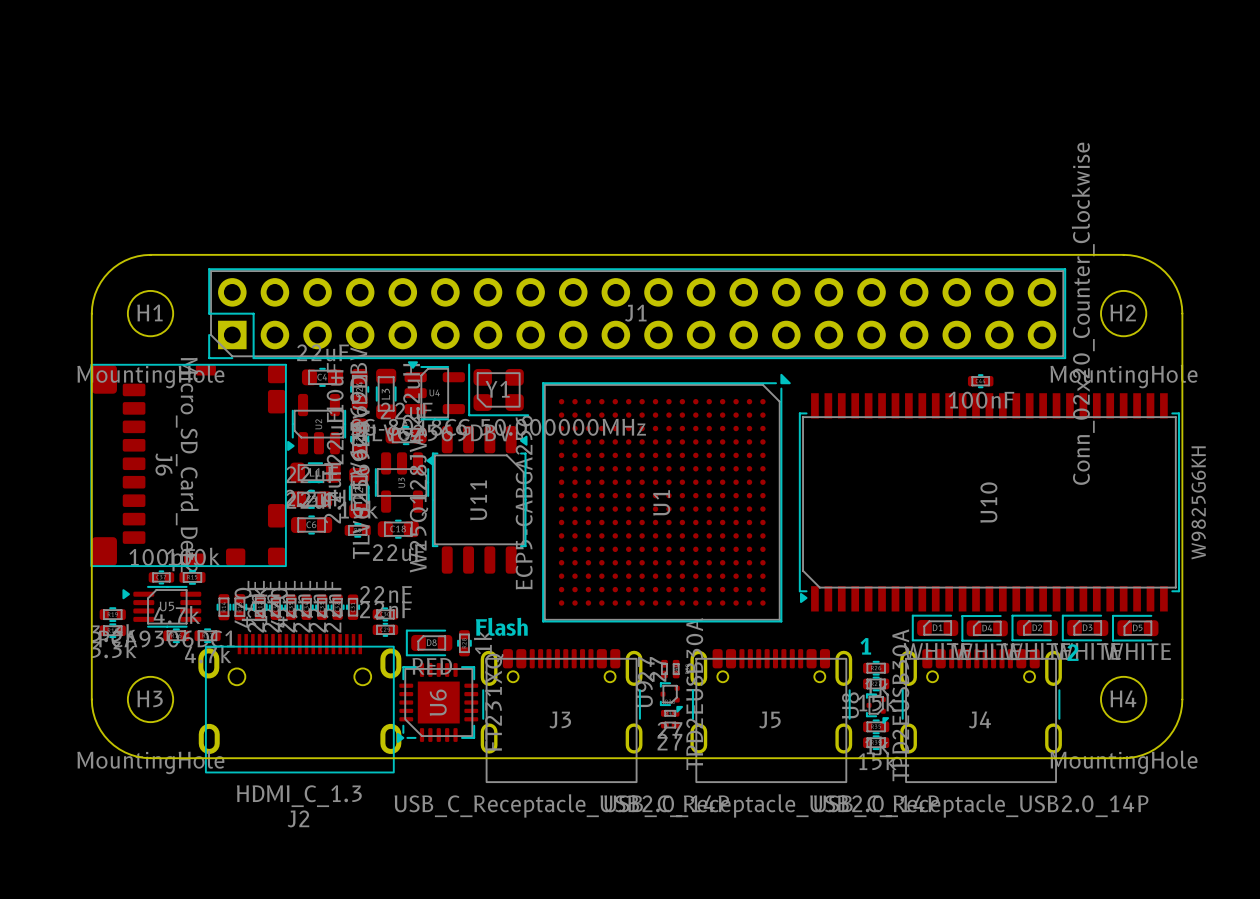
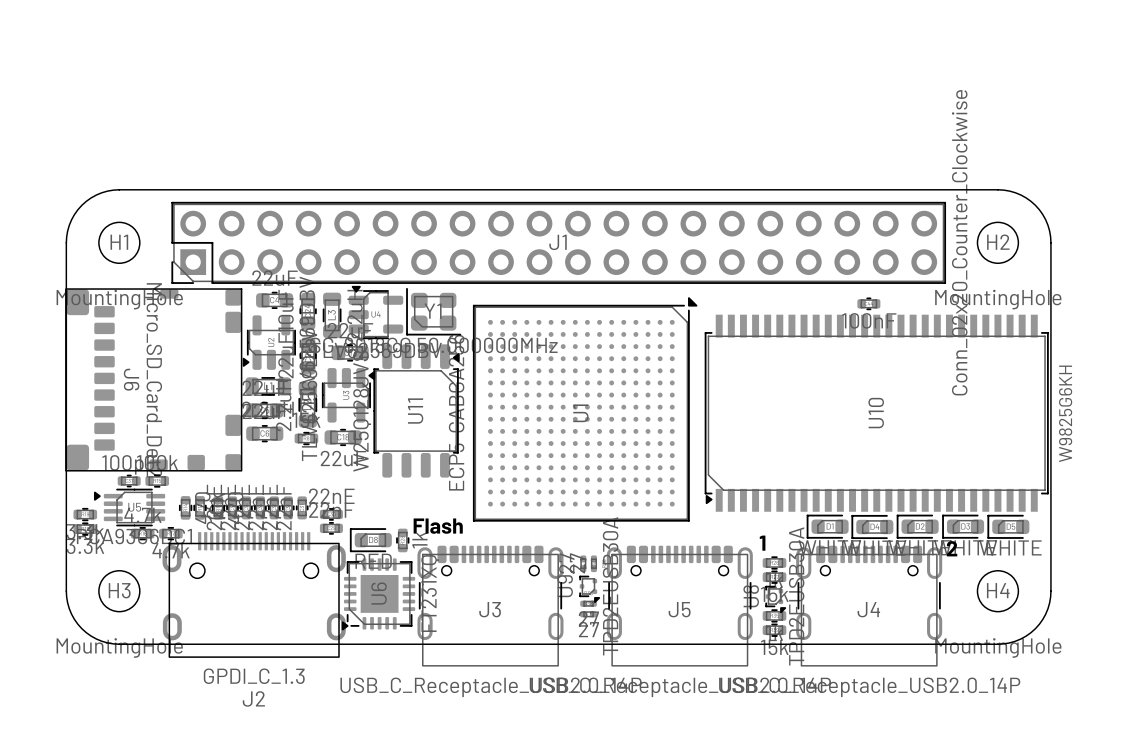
J2 value: HDMI_C_1.3 (299, 796) -> GPDI_C_1.3 (254, 676)

